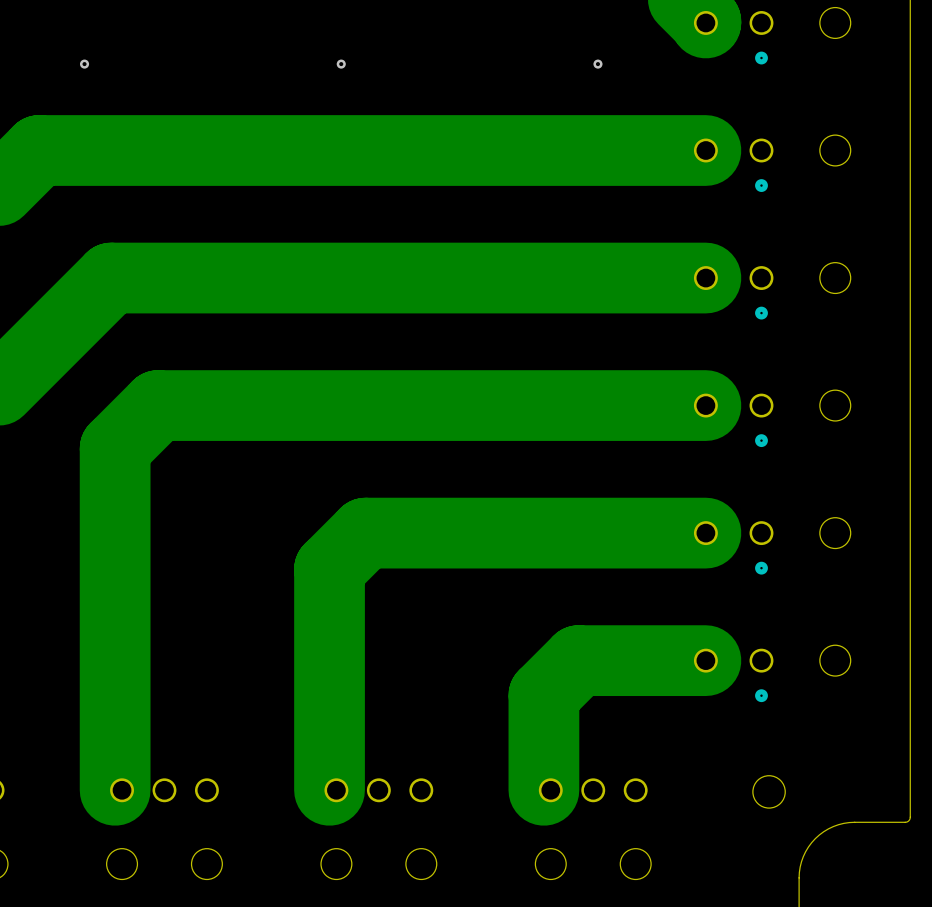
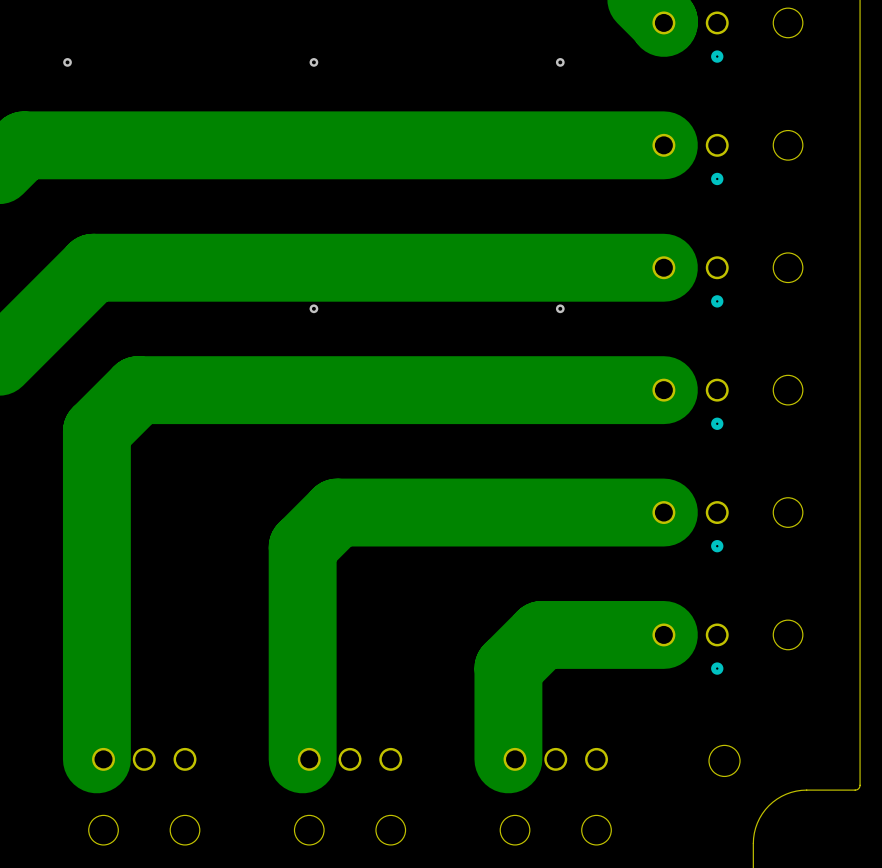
via: none -> (313, 308)
via: none -> (560, 308)

